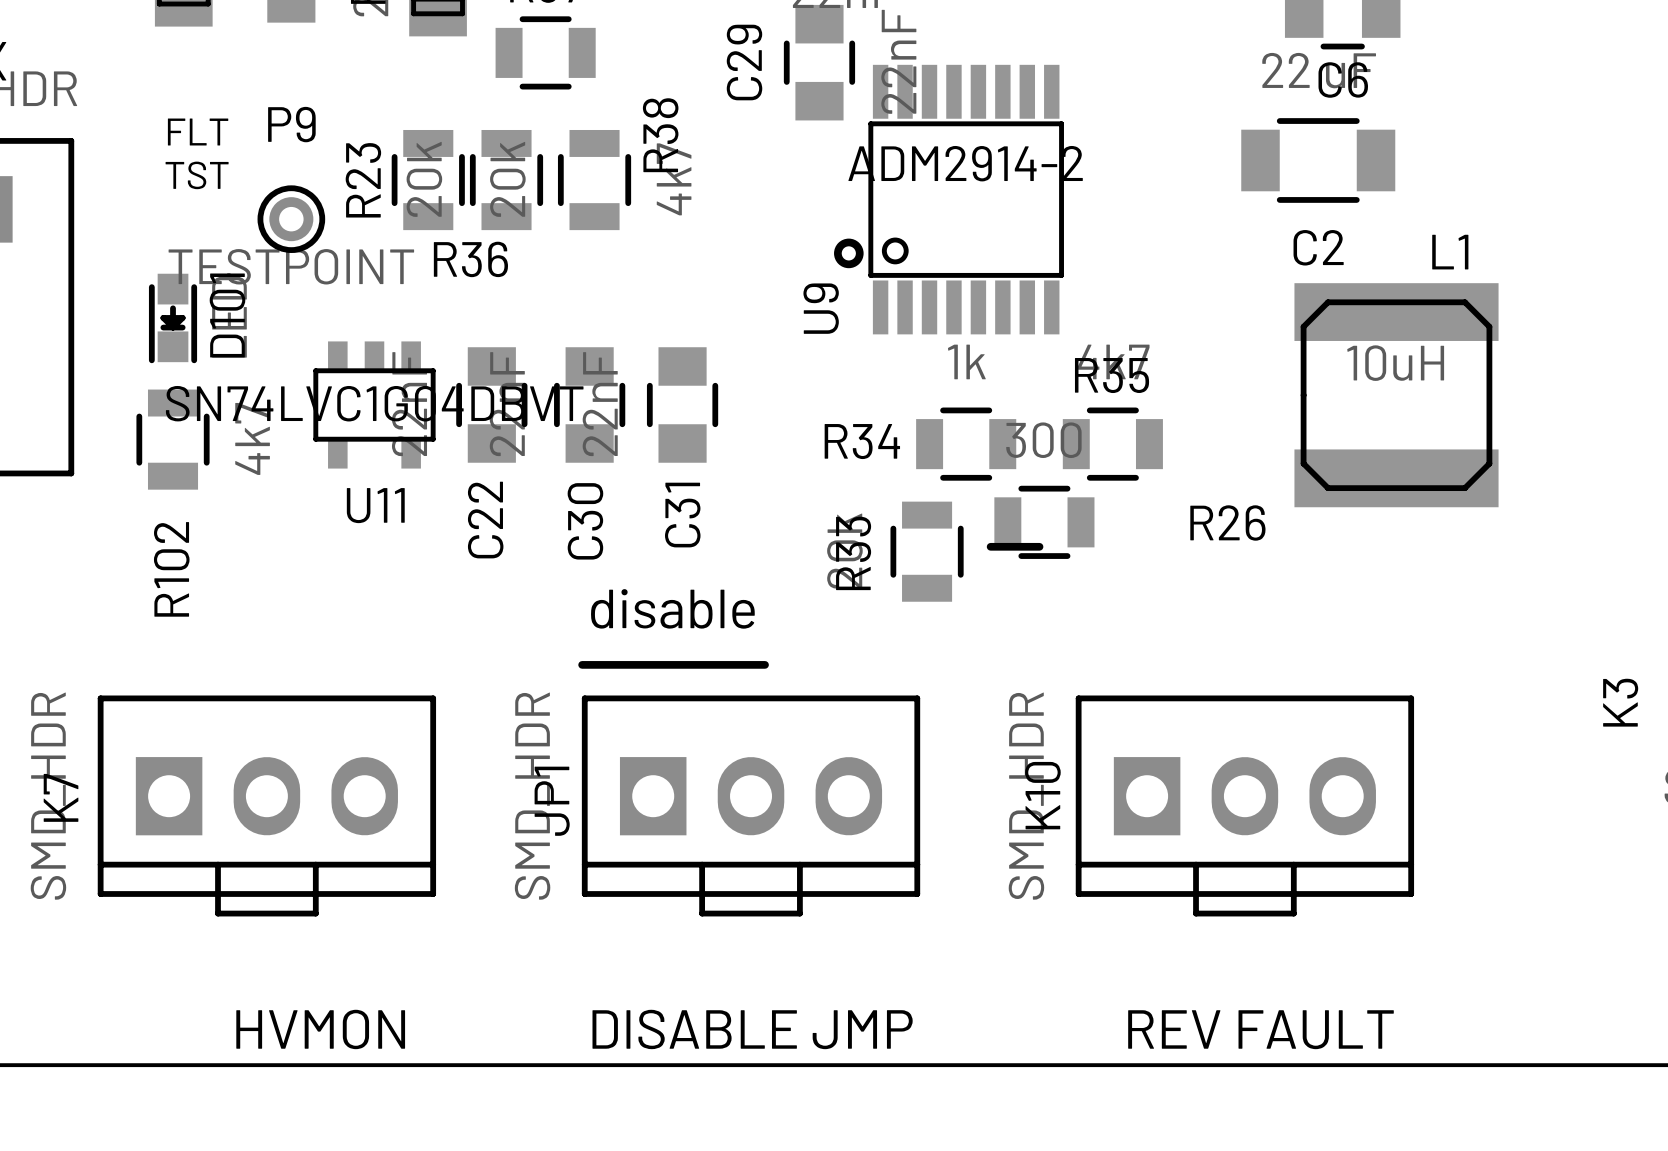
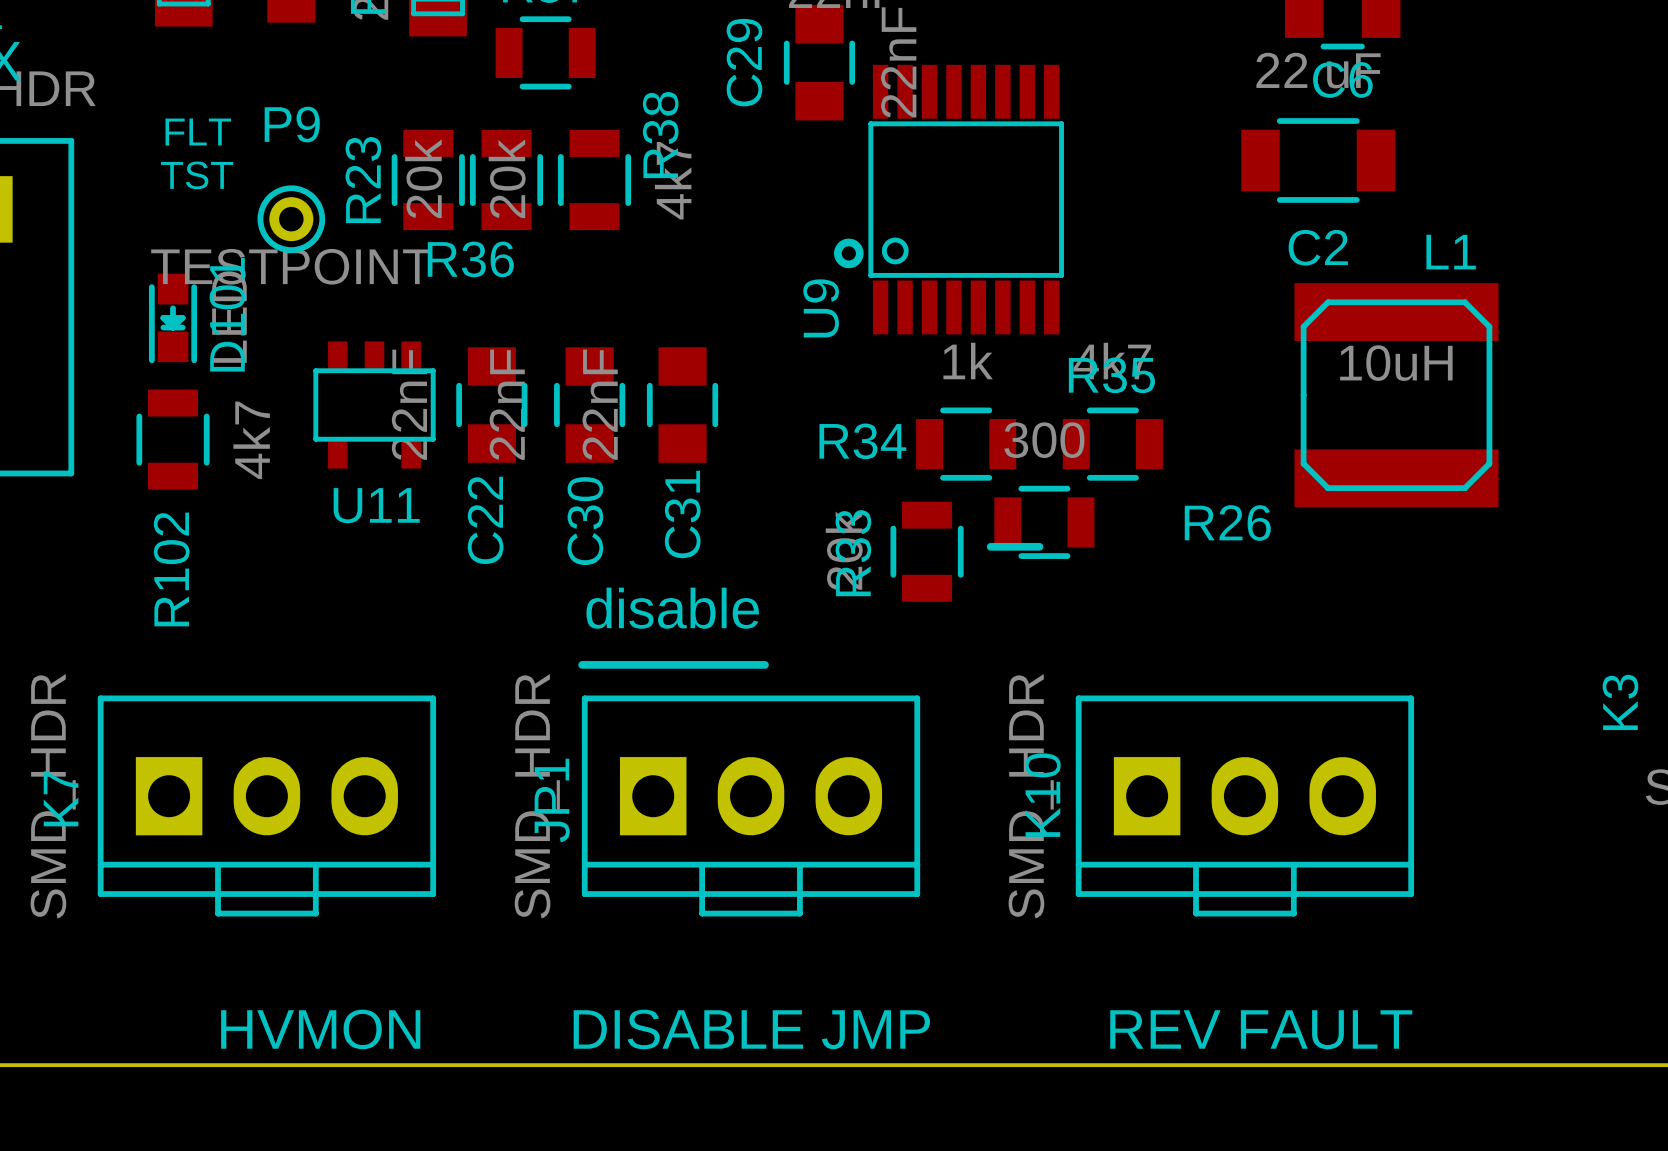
U9 value: ADM2914-2 (965, 163) -> none
U11 value: SN74LVC1G04DBVT (374, 403) -> none

